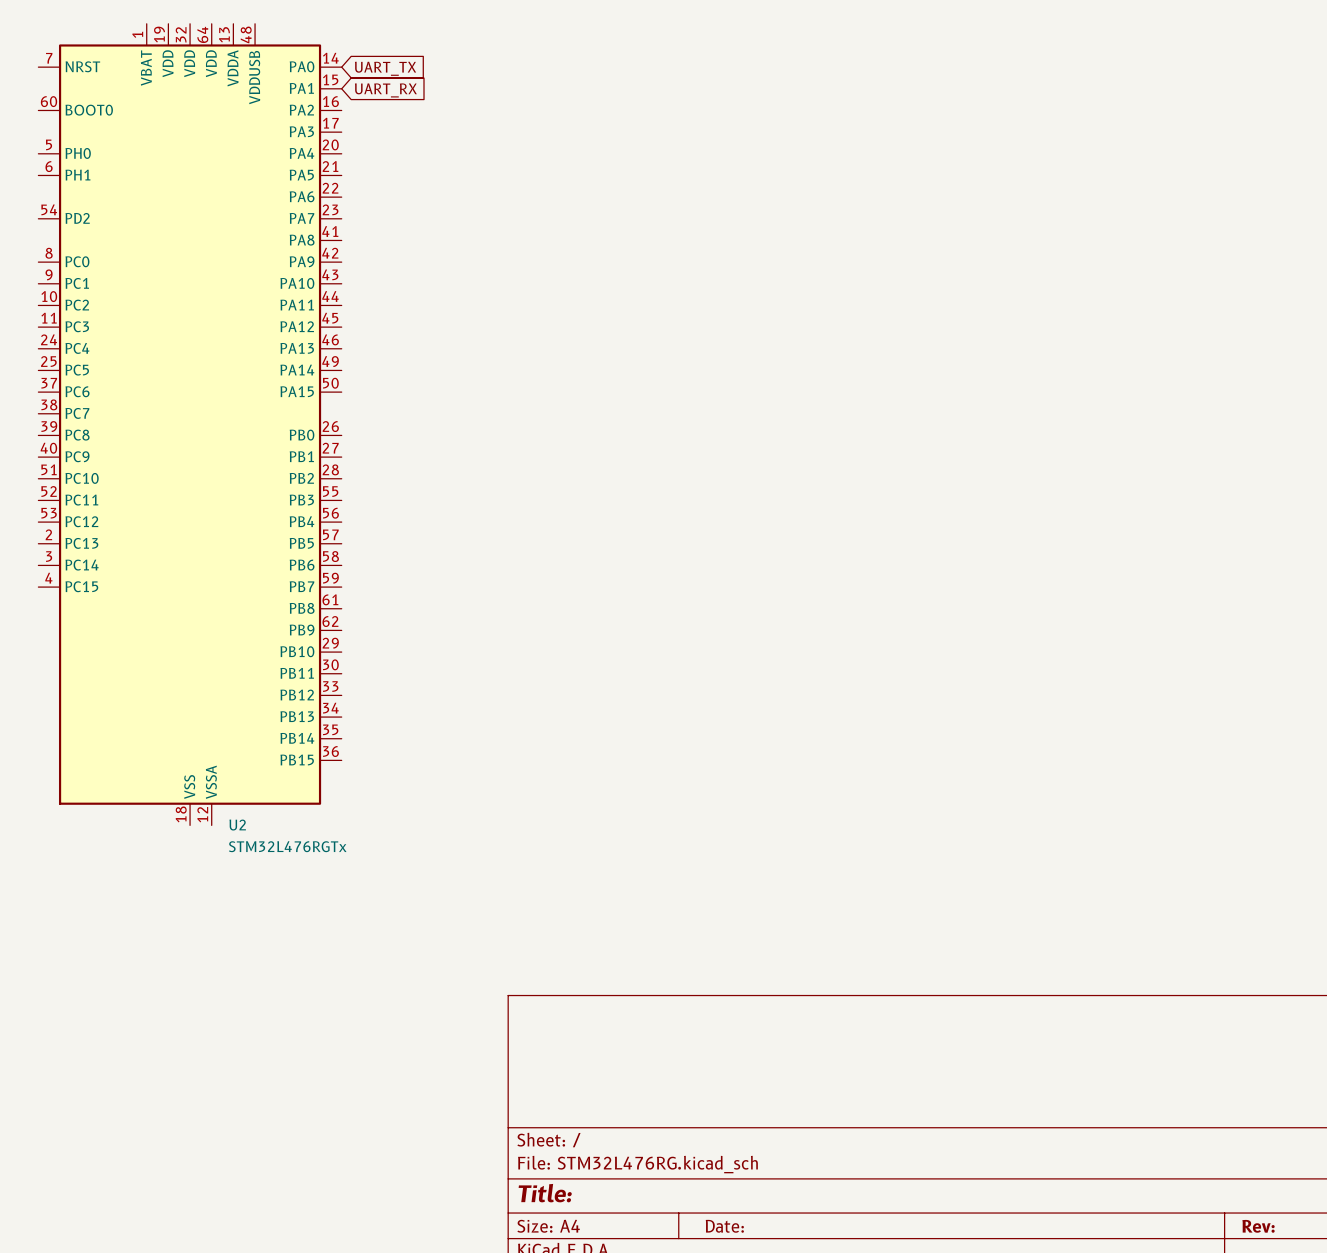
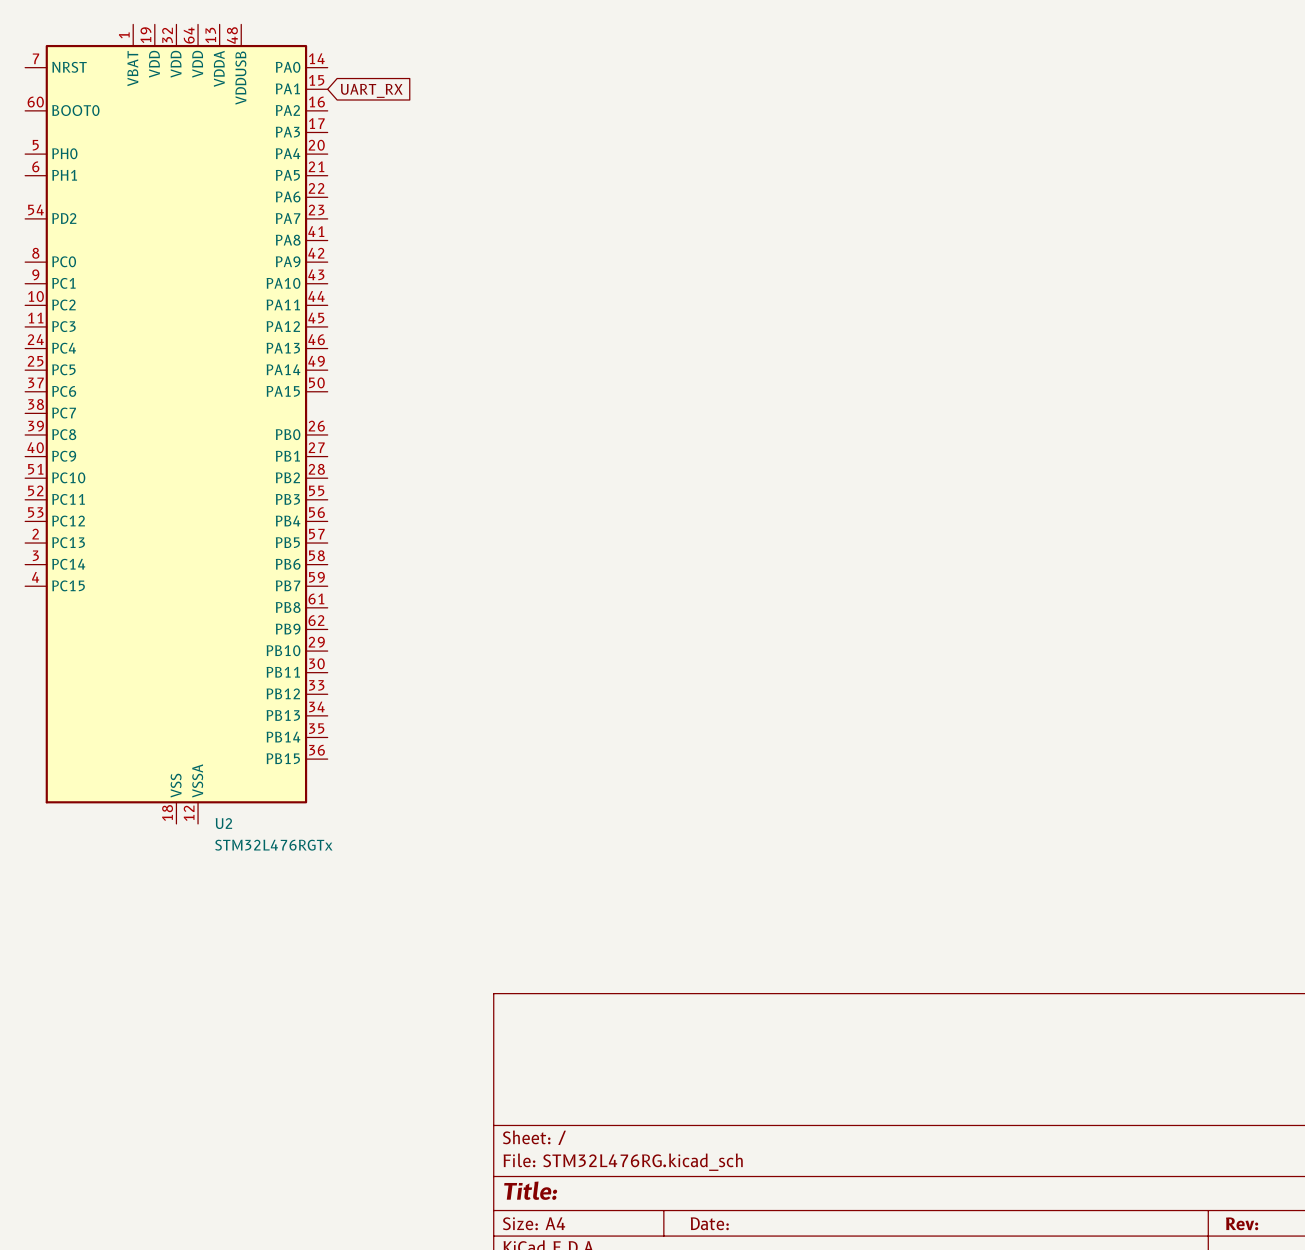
global label: UART_TX (385, 68) -> none

